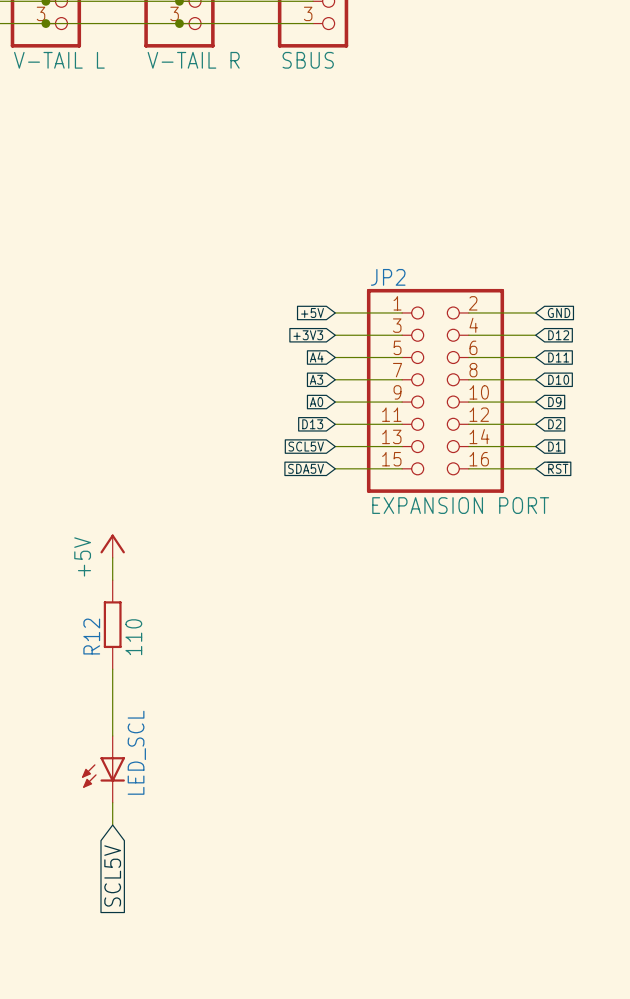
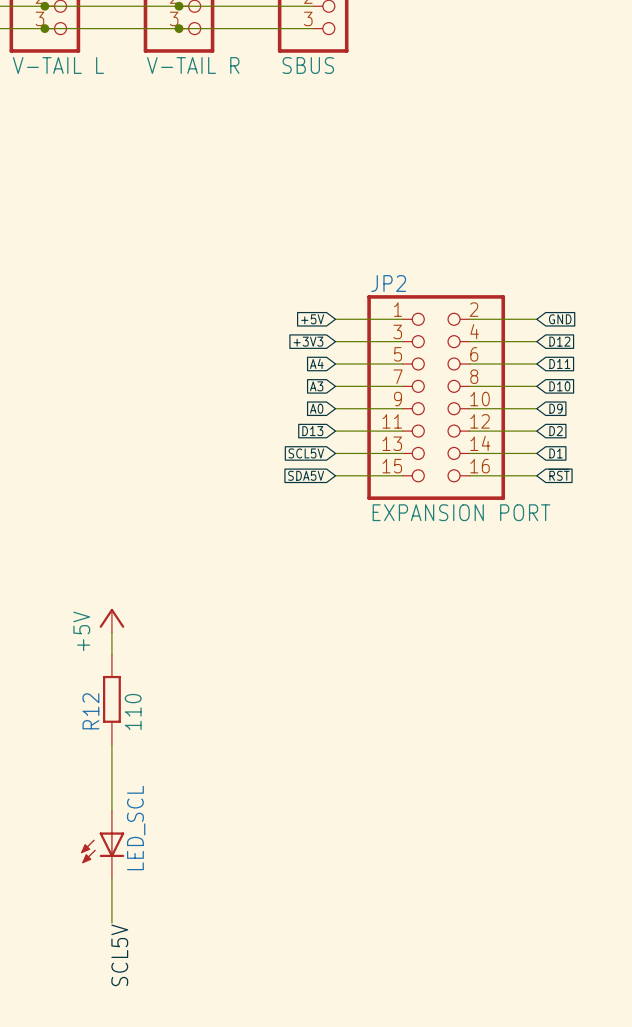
power symbol position: +5V (112, 546) -> +5V (111, 620)
wire: (112, 557) (112, 580) -> (111, 632) (111, 654)
R12 position: (112, 624) -> (111, 699)
wire: (112, 669) (112, 735) -> none
LED_SCL position: (103, 769) -> (102, 844)
wire: none -> (111, 878) (111, 922)
global label: SCL5V (112, 875) -> none
label: none -> SCL5V (119, 955)

